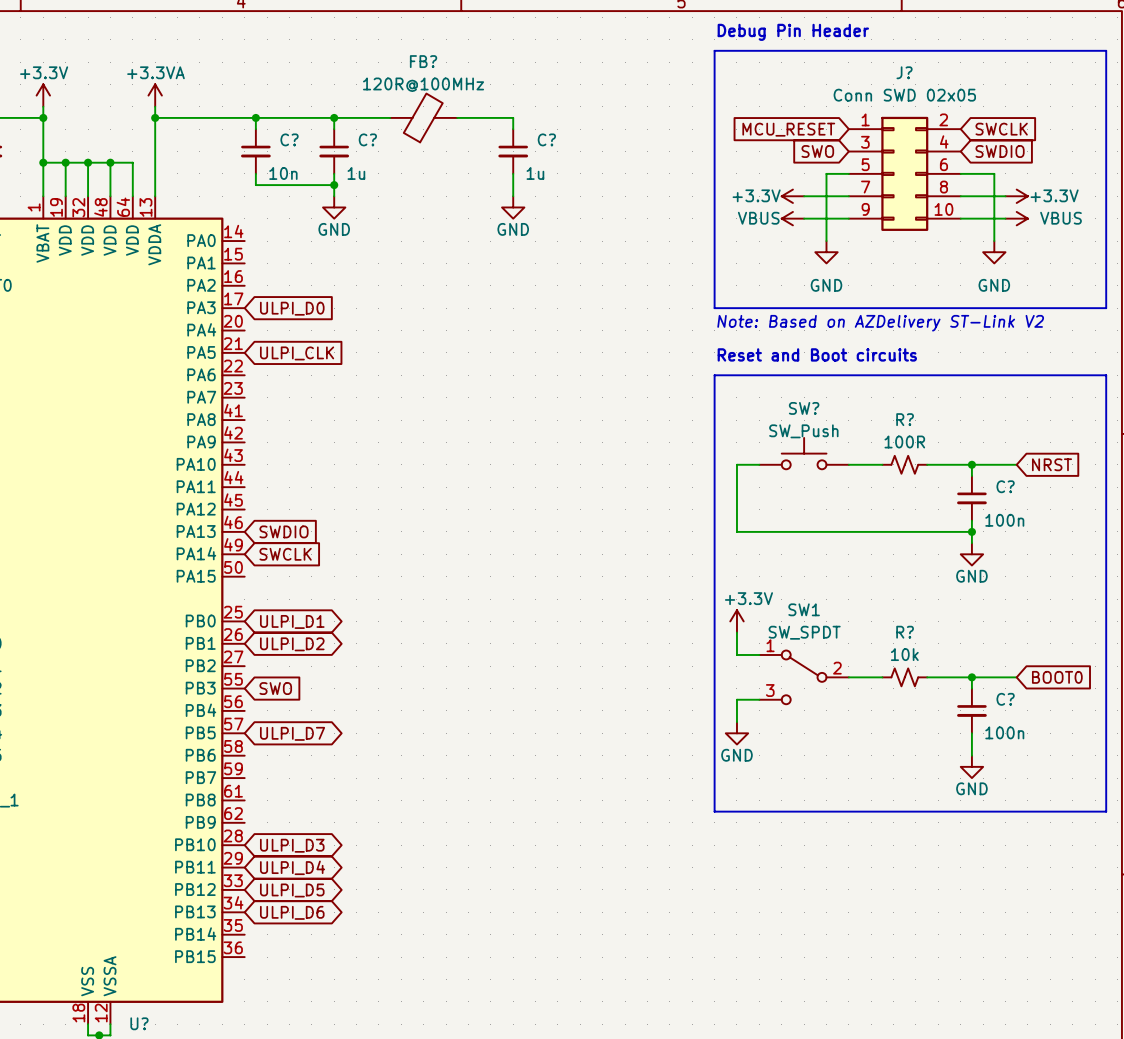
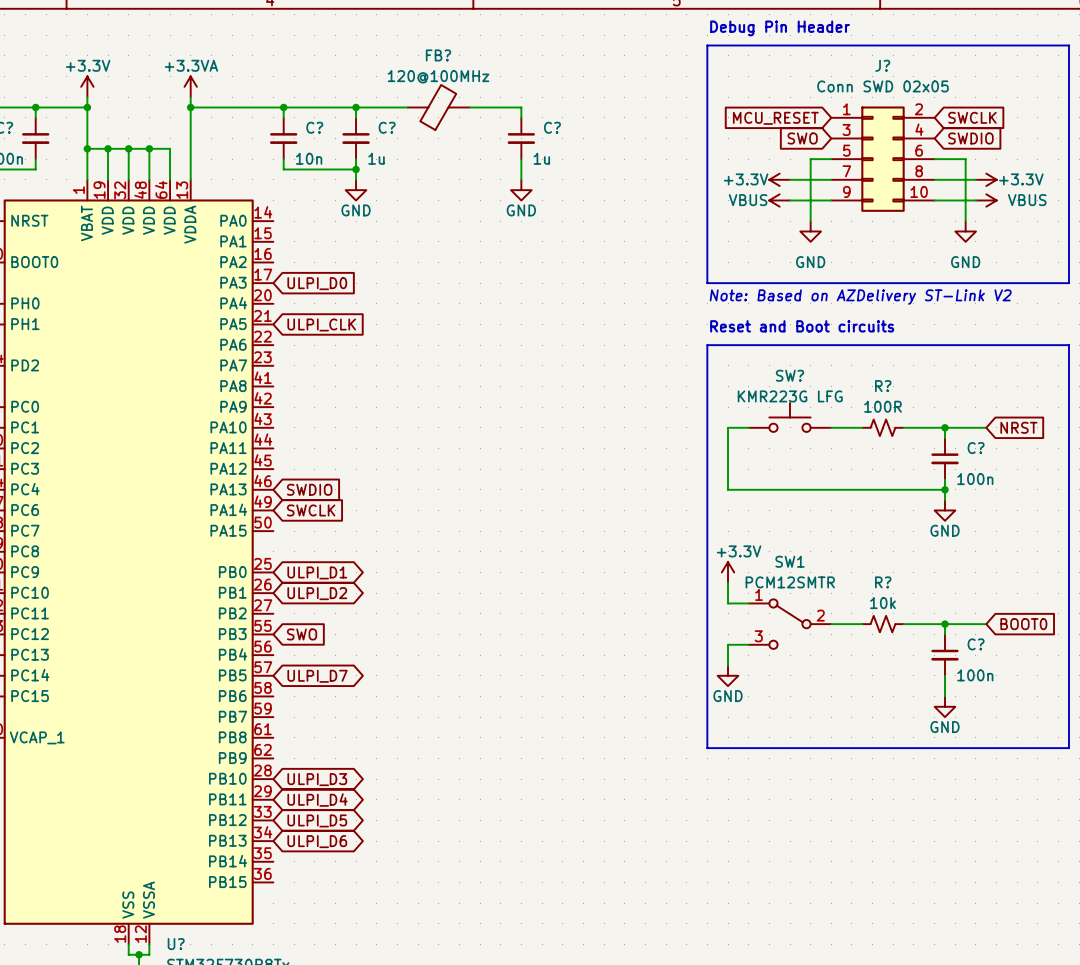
FB? value: 120R@100MHz (423, 84) -> 120@100MHz (438, 76)
SW? value: SW_Push (803, 431) -> KMR223G LFG (790, 396)
SW1 value: SW_SPDT (804, 632) -> PCM12SMTR (790, 582)

